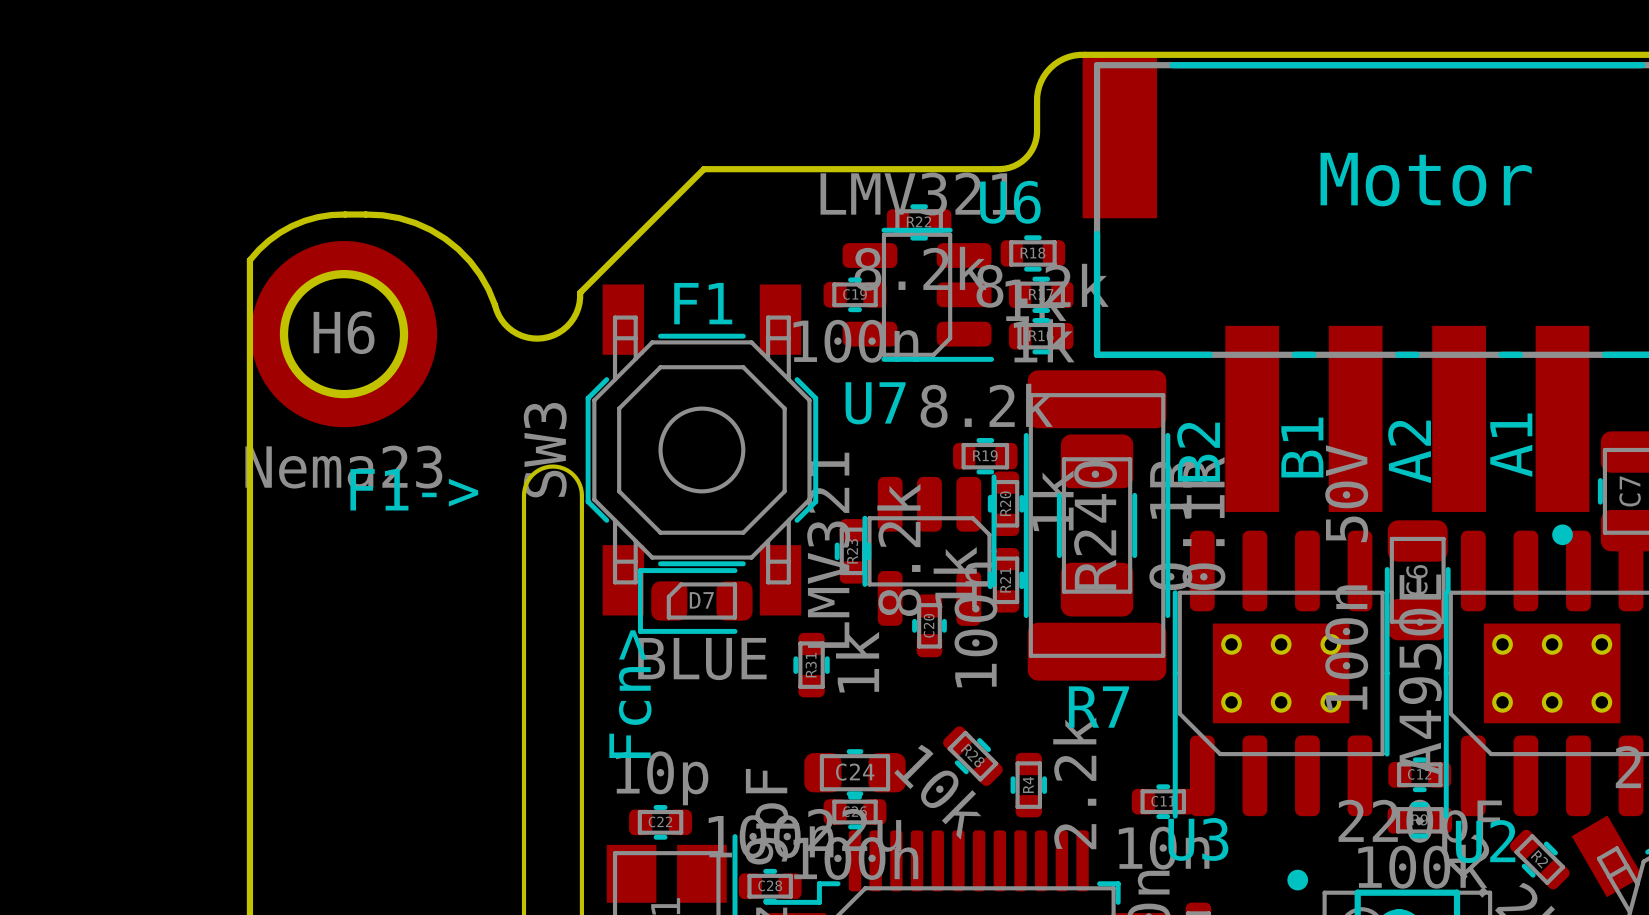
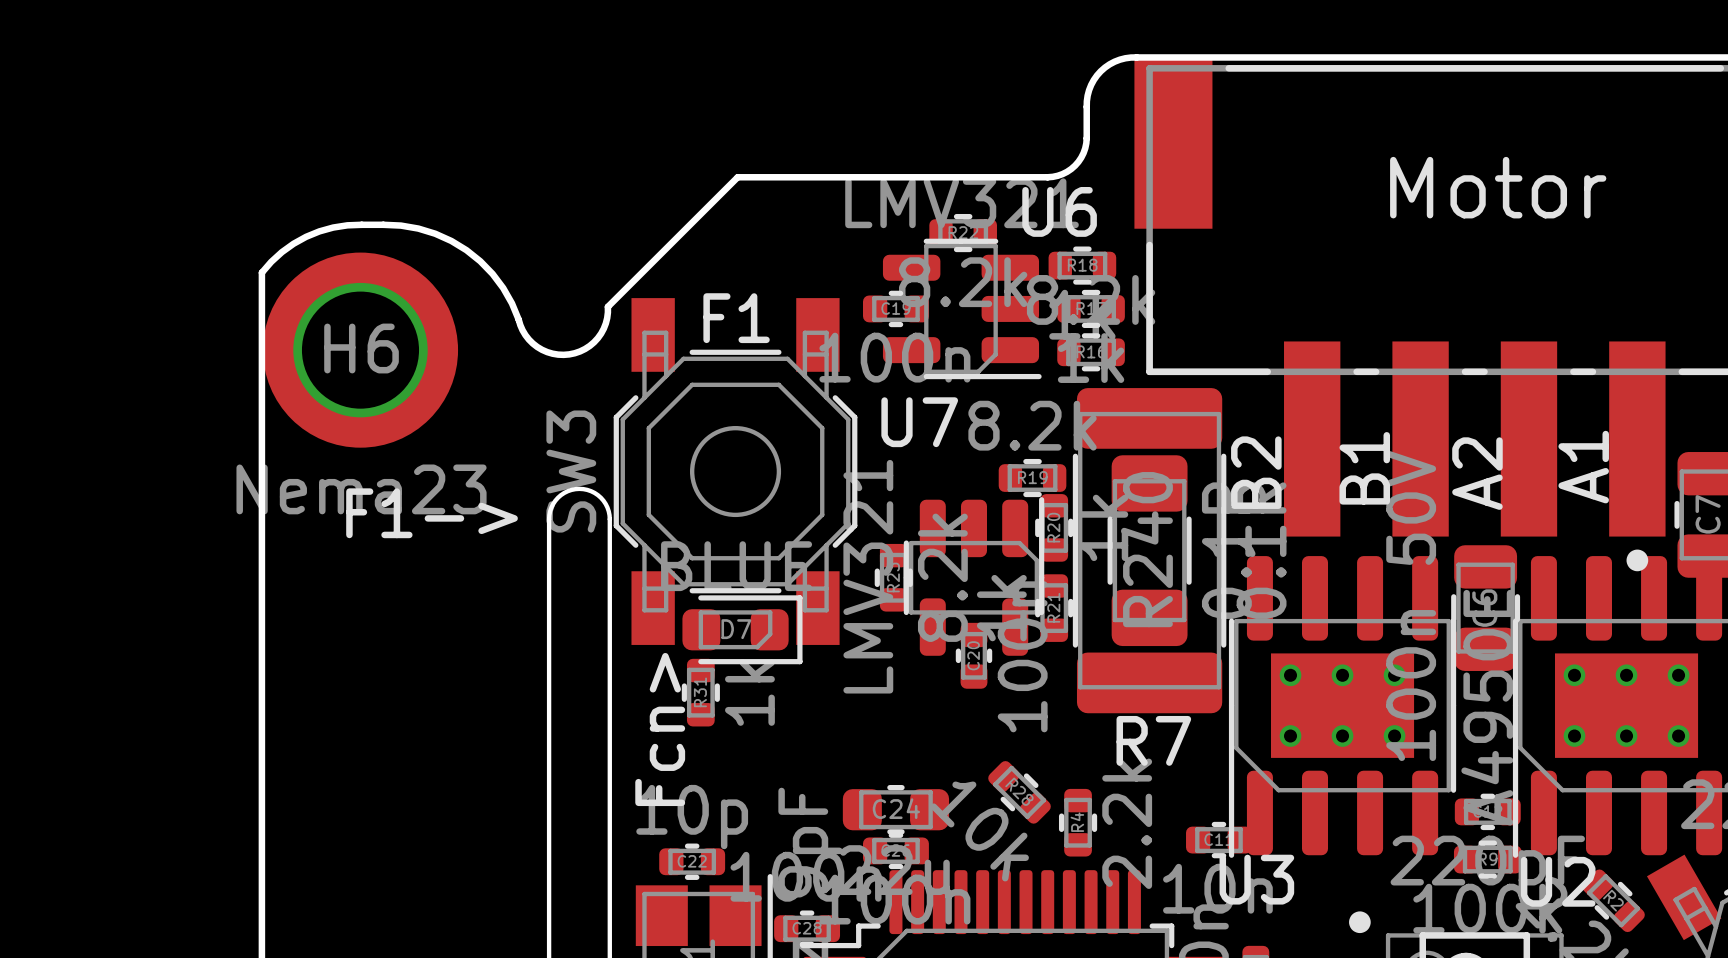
D7 rotation: 0° (695, 601) -> 180° (742, 629)
R31 position: (811, 665) -> (700, 692)

